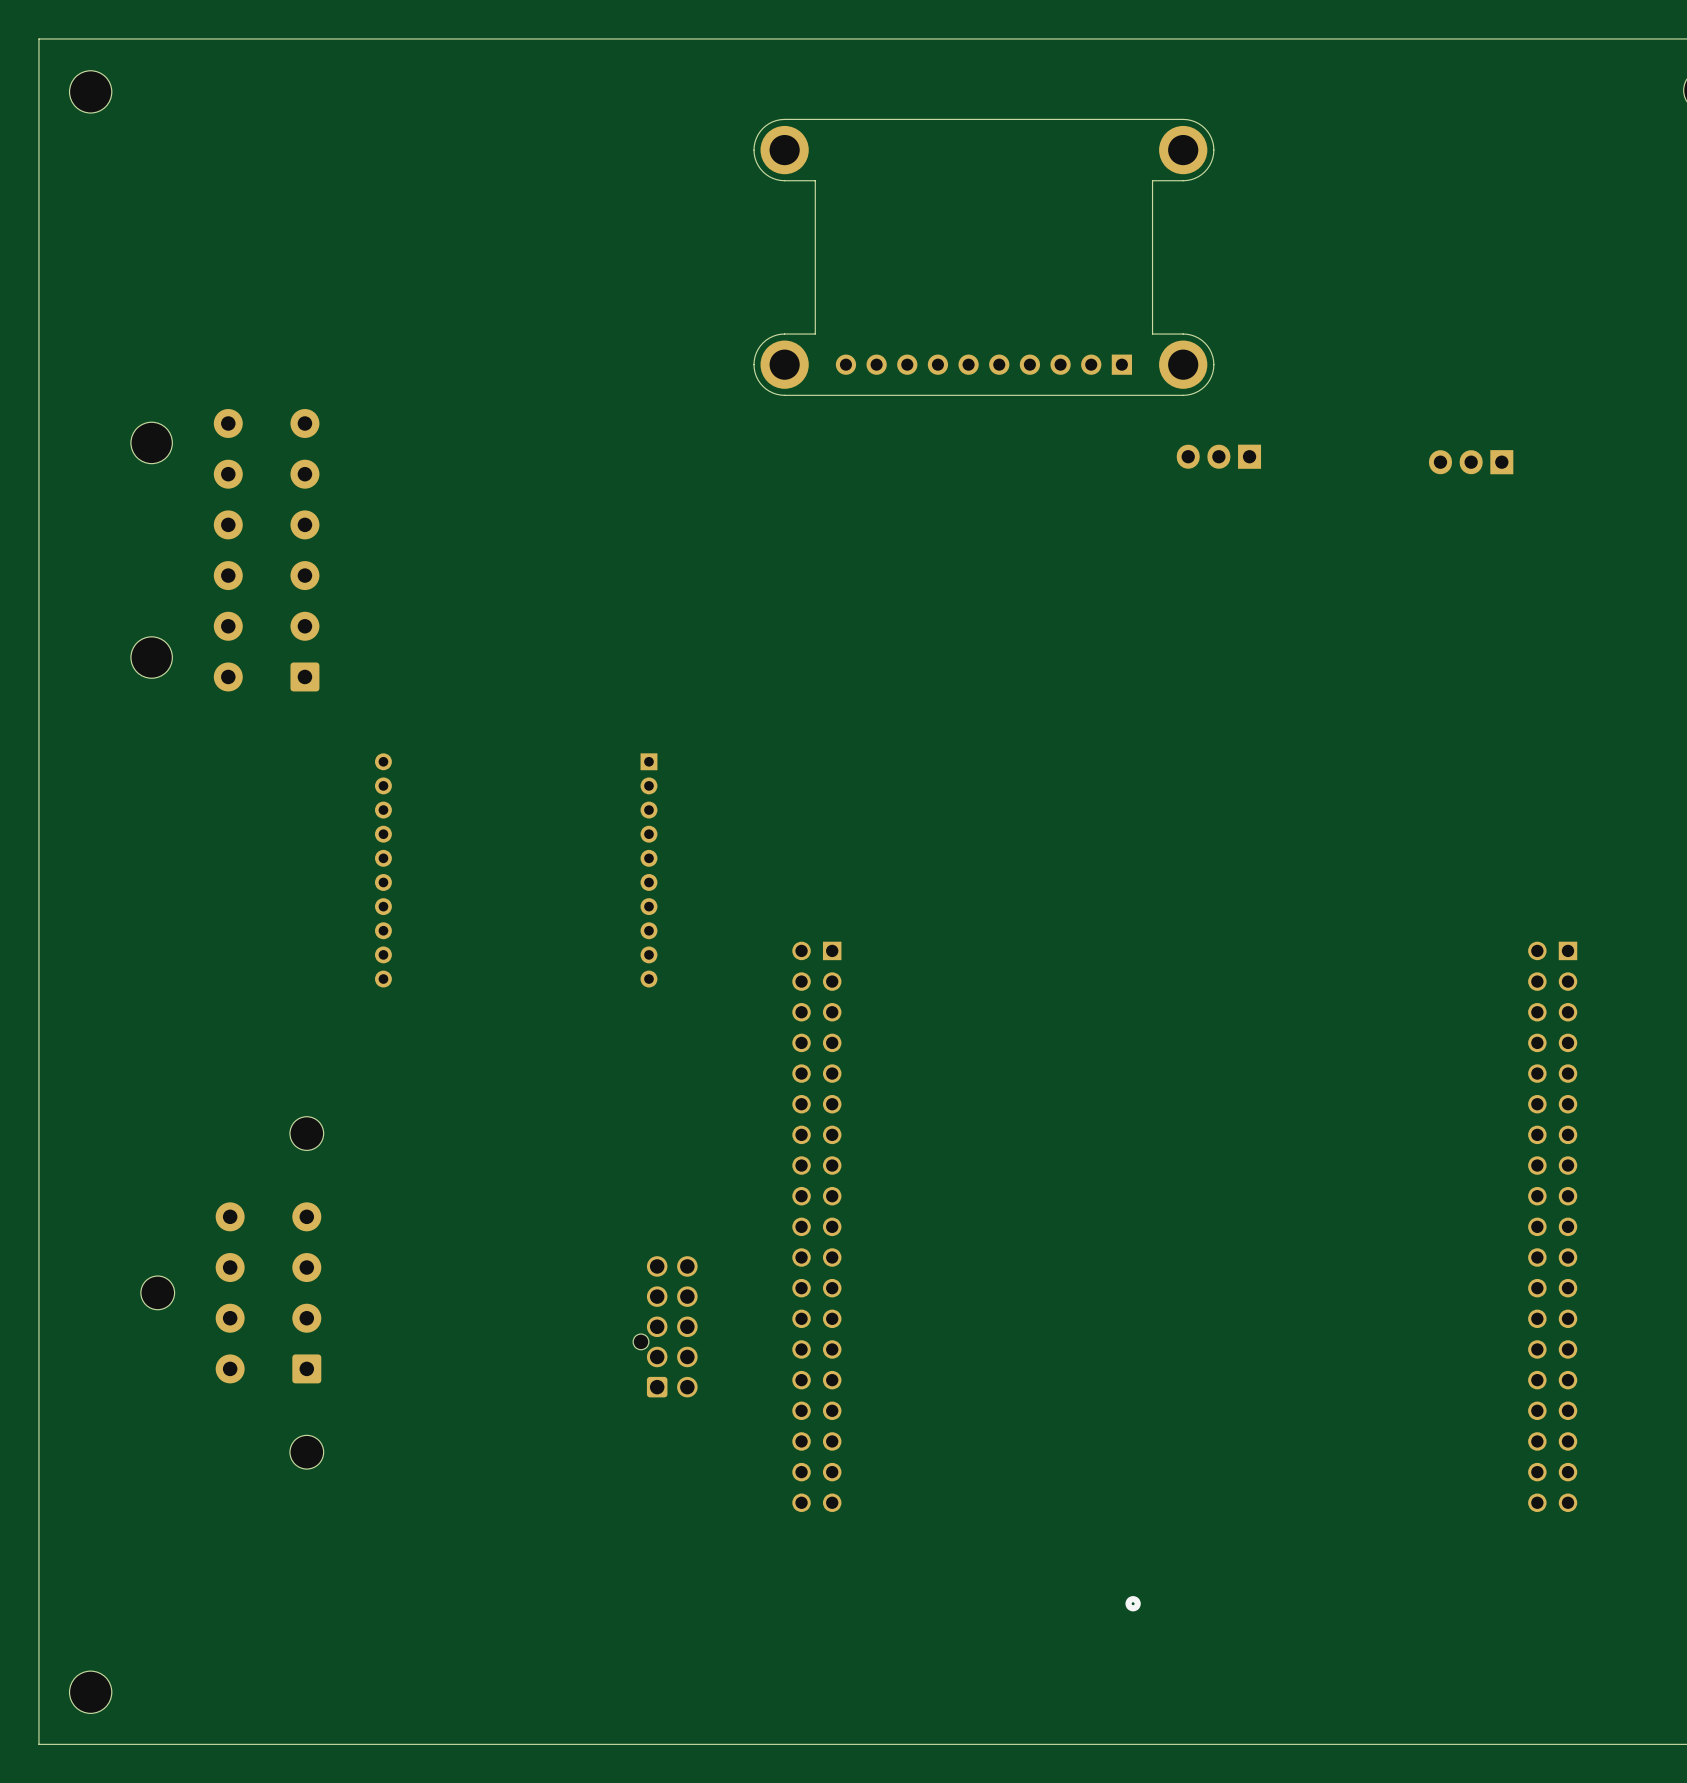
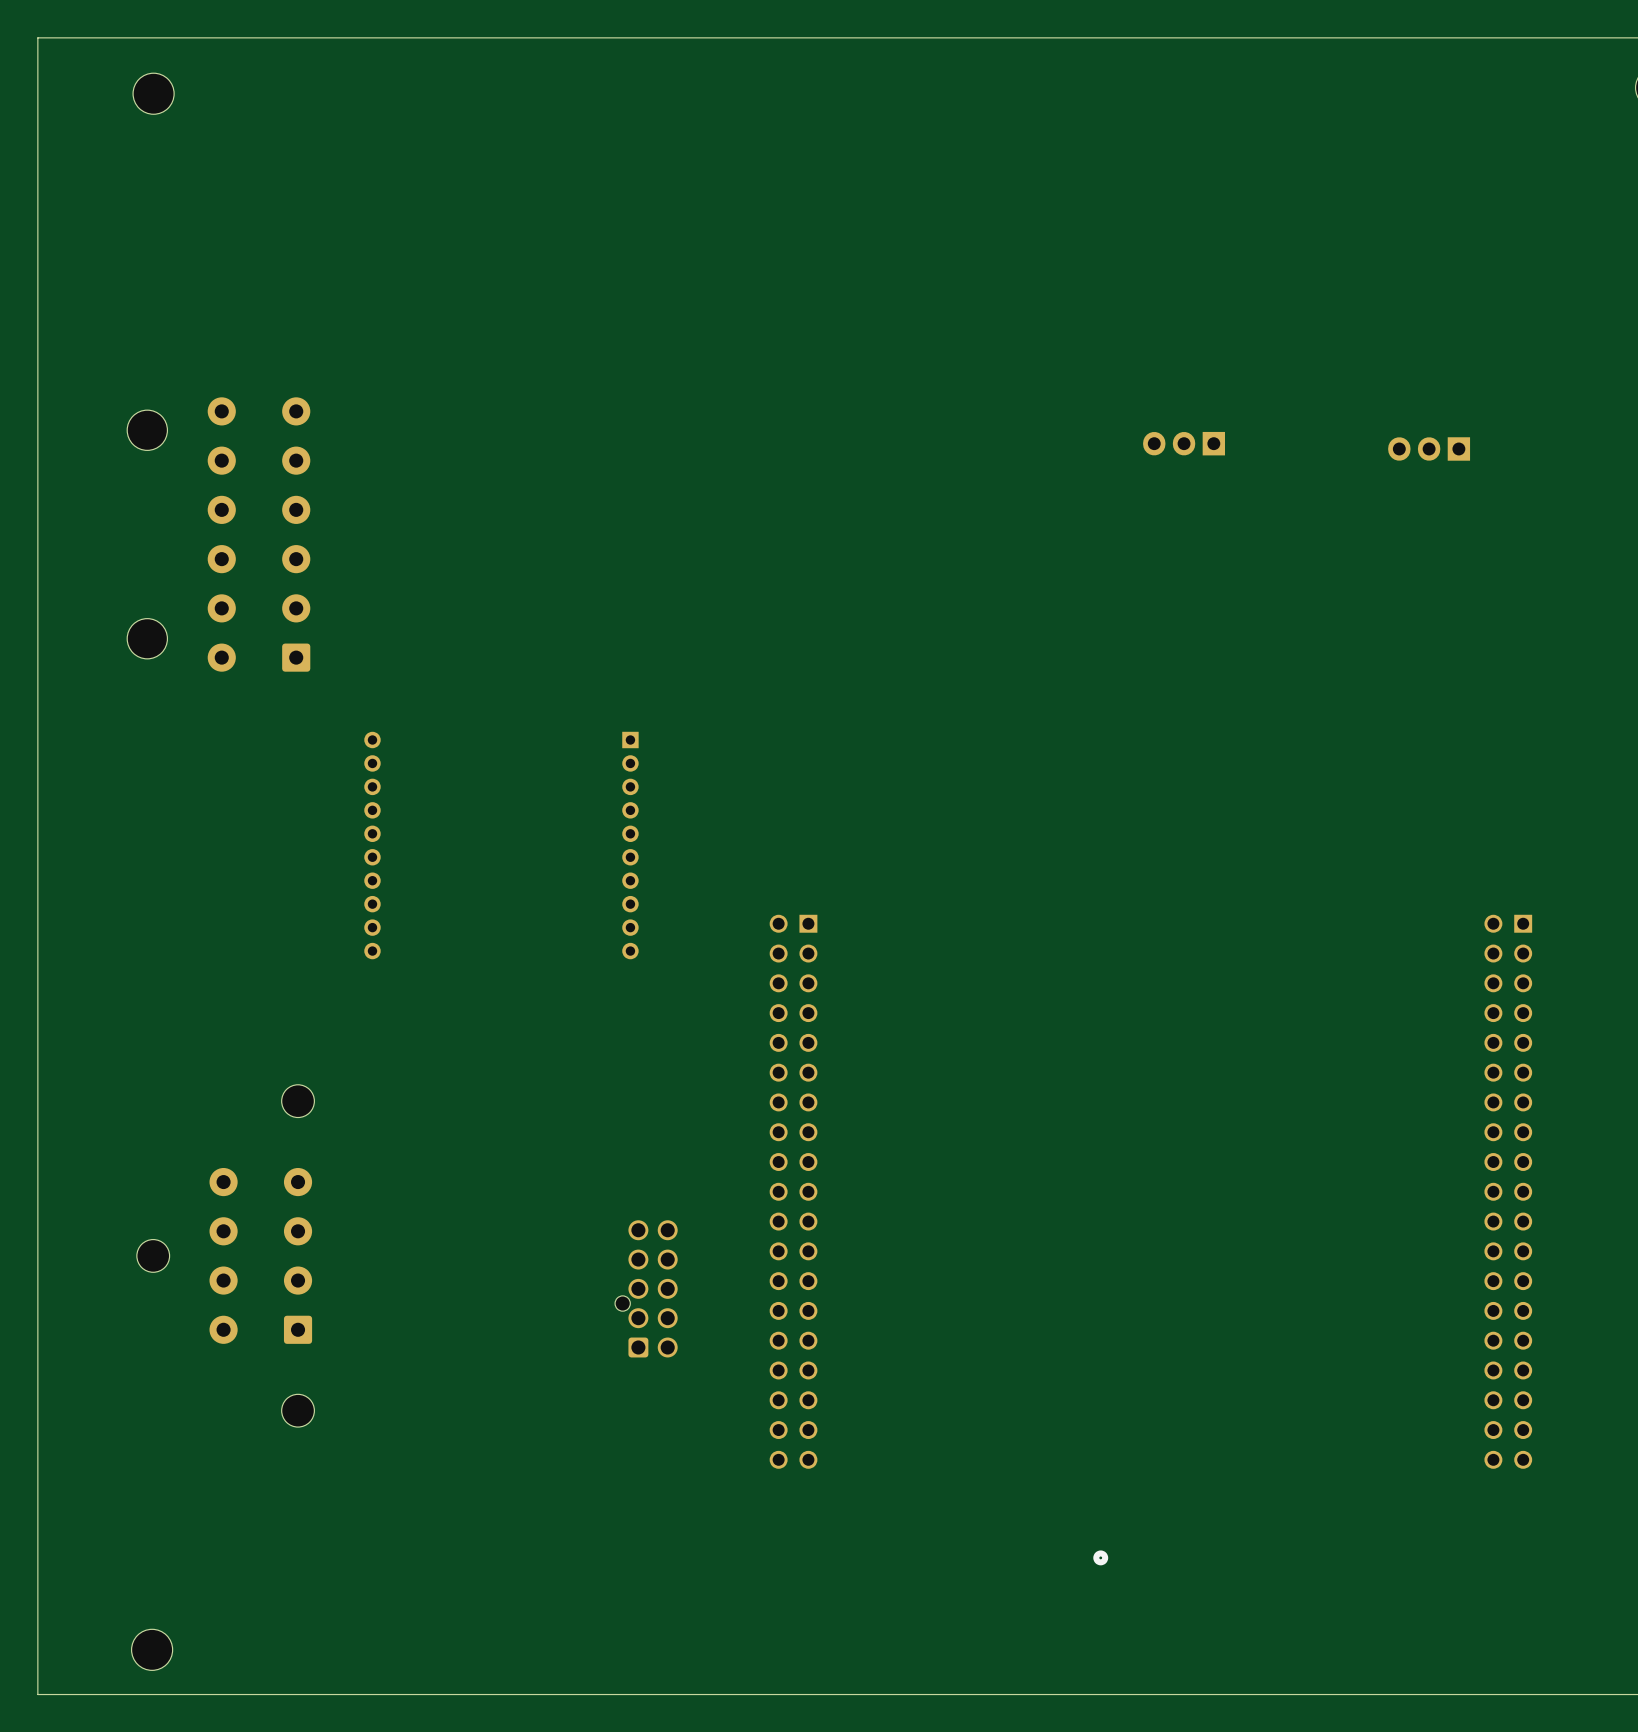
part position: (90, 91) -> (153, 93)
part: (983, 257) -> none
part position: (90, 1692) -> (152, 1649)

